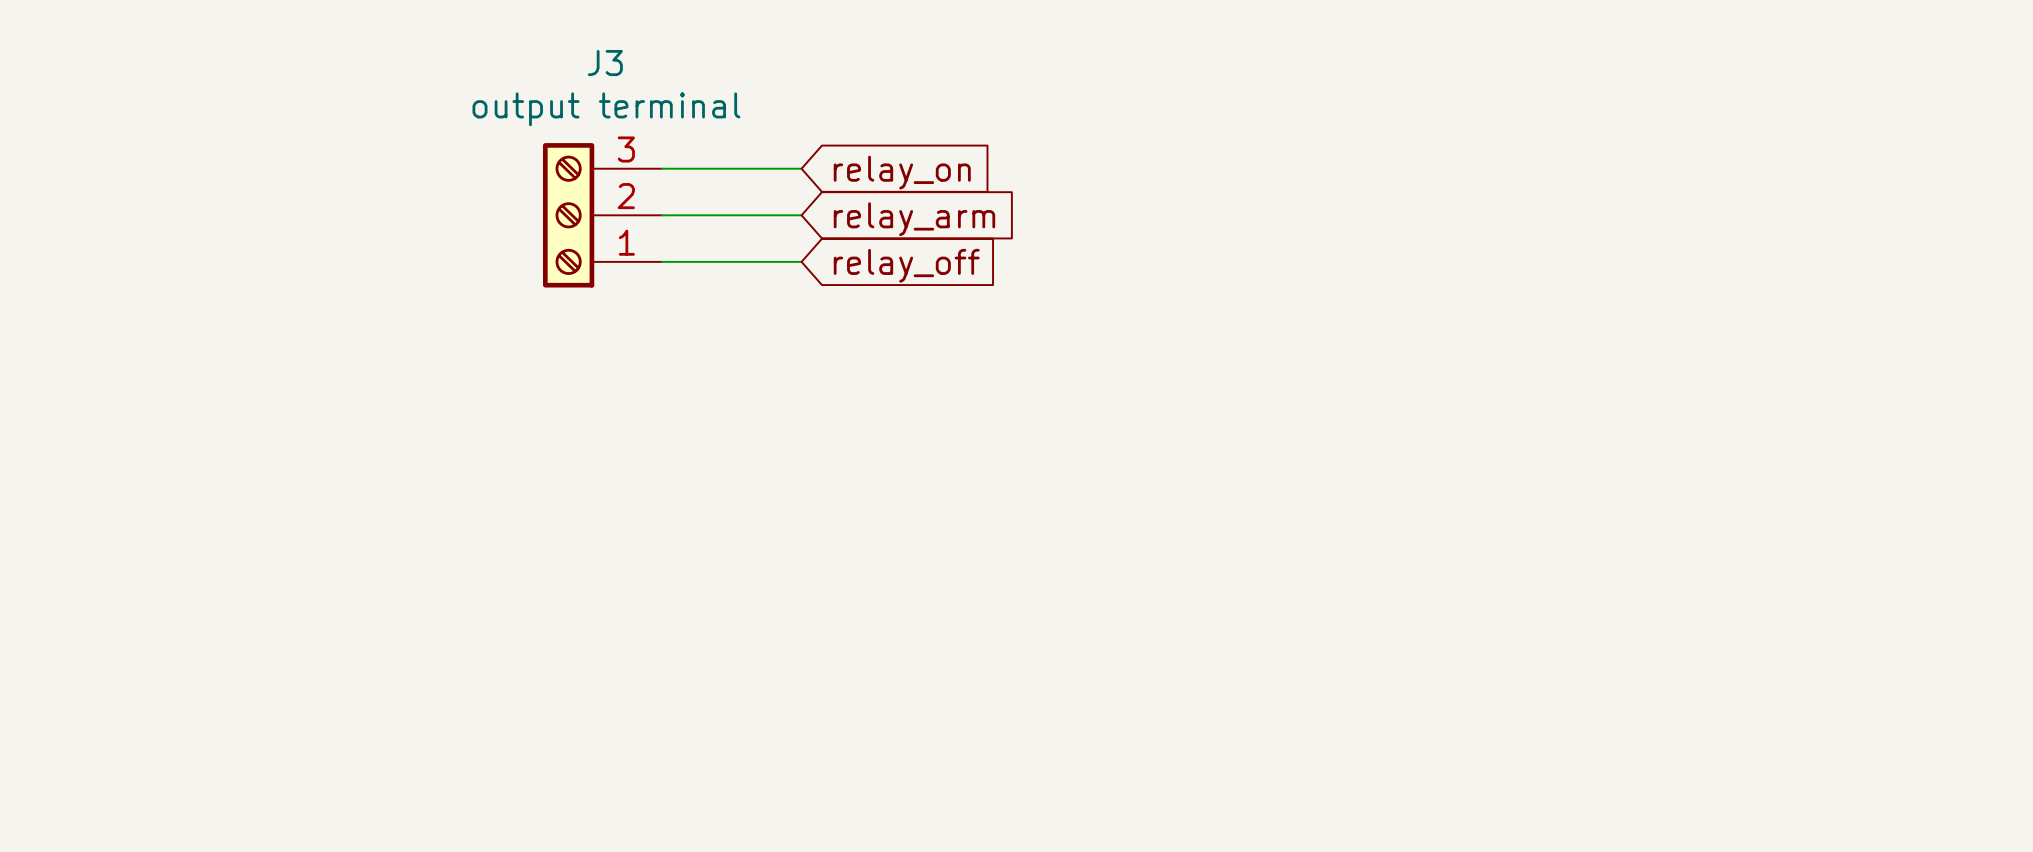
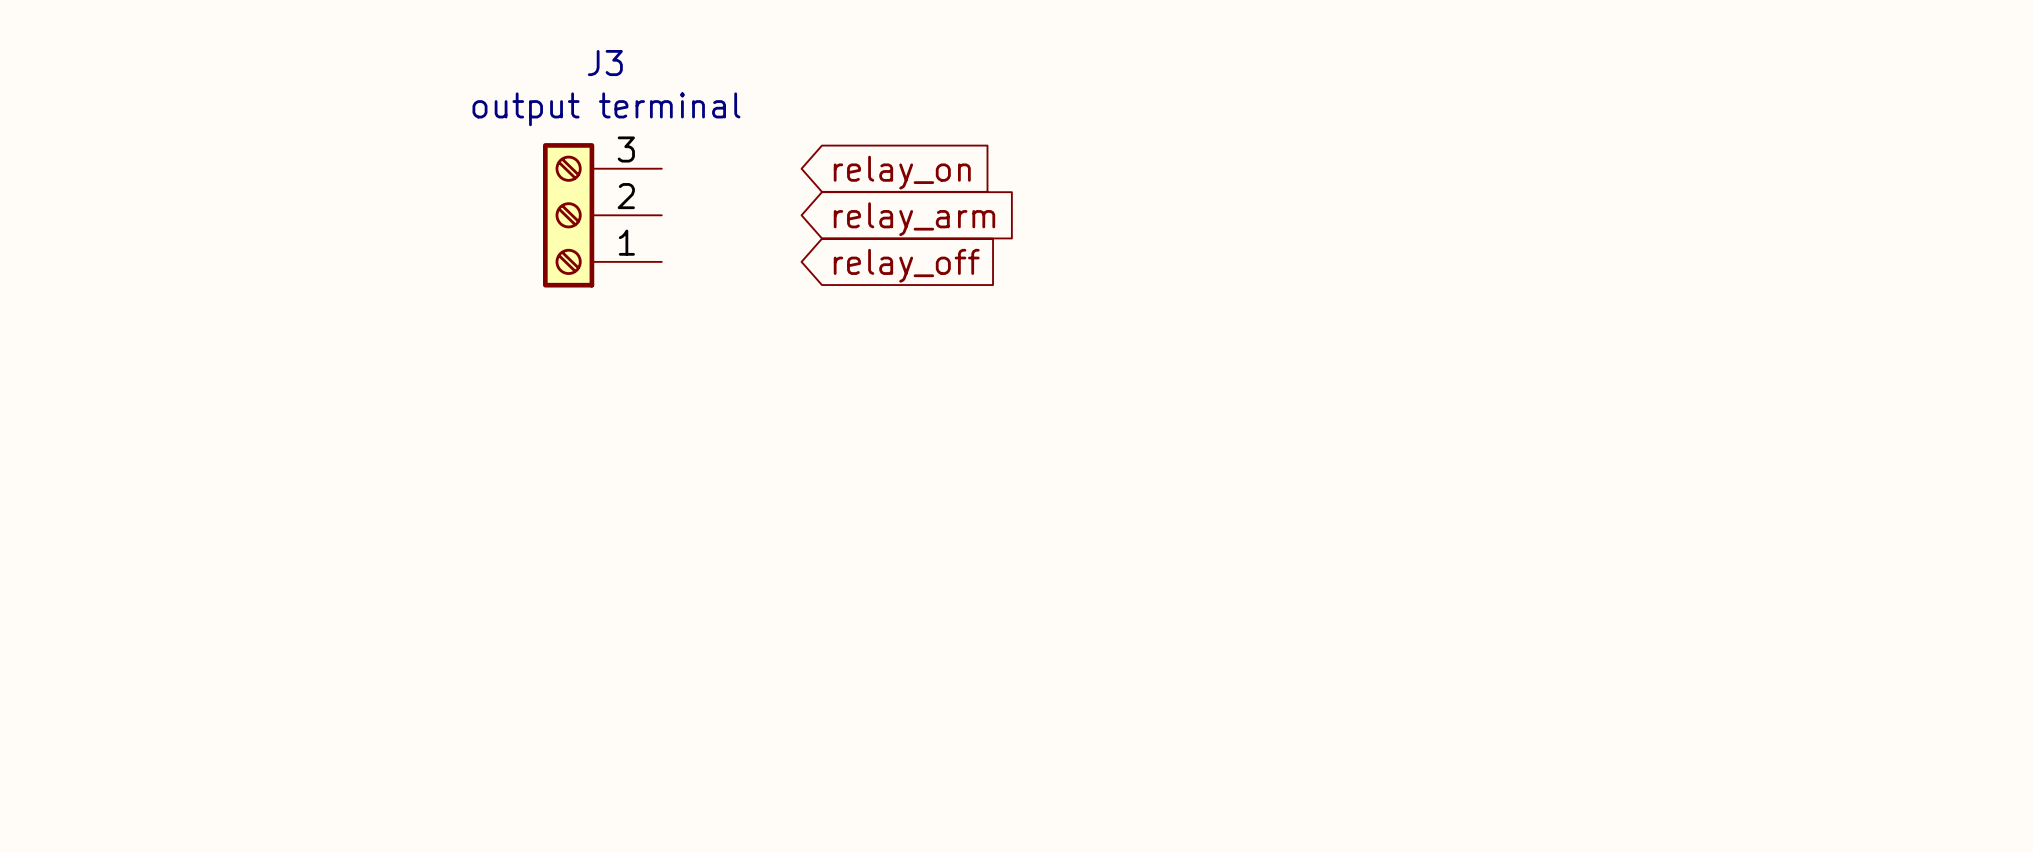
wire: (661, 168) (801, 168) -> none
wire: (661, 215) (801, 215) -> none
wire: (661, 261) (801, 261) -> none

